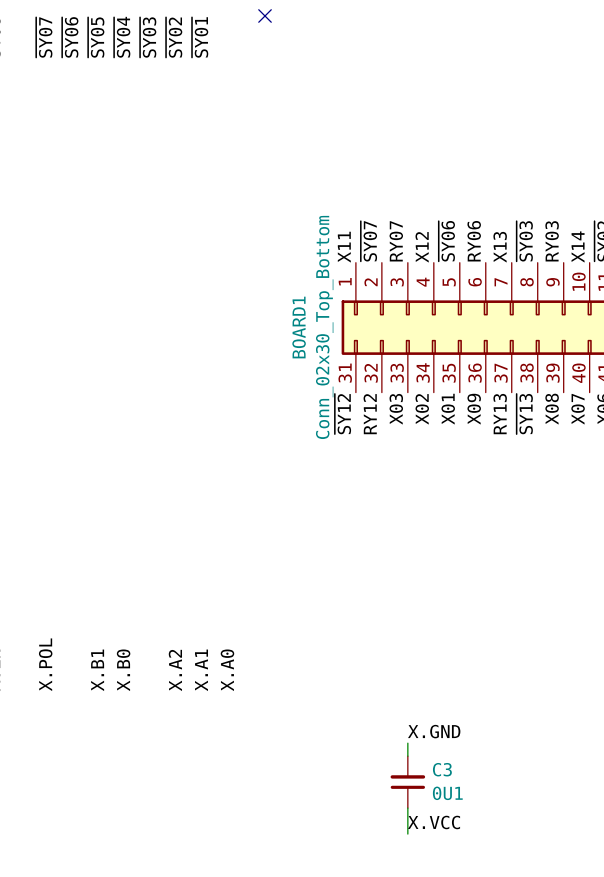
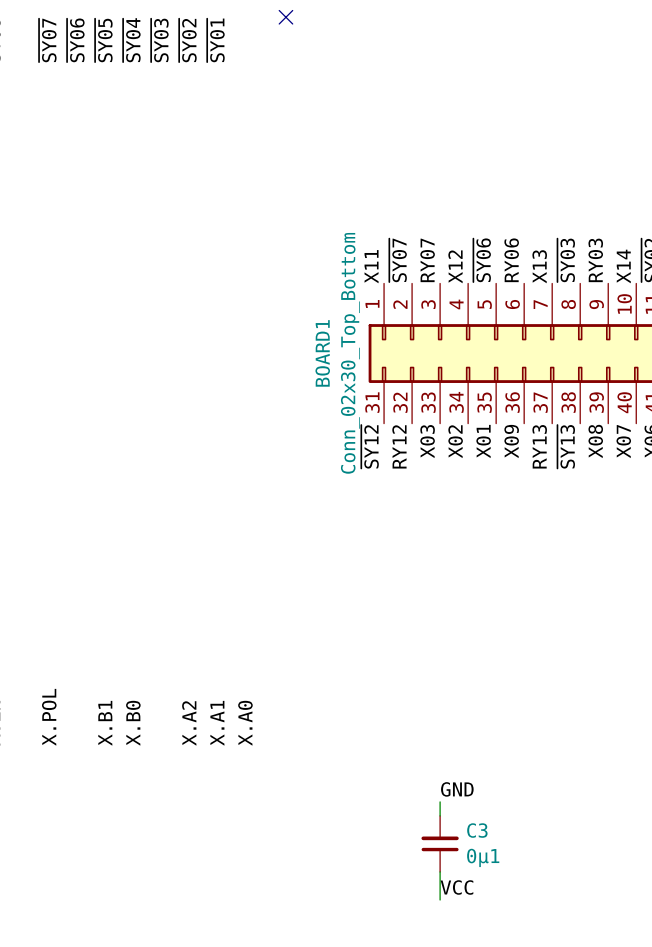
label: X.GND (434, 731) -> GND (457, 789)
C3 value: 0U1 (447, 793) -> 0µ1 (483, 857)
label: X.VCC (434, 822) -> VCC (456, 887)

